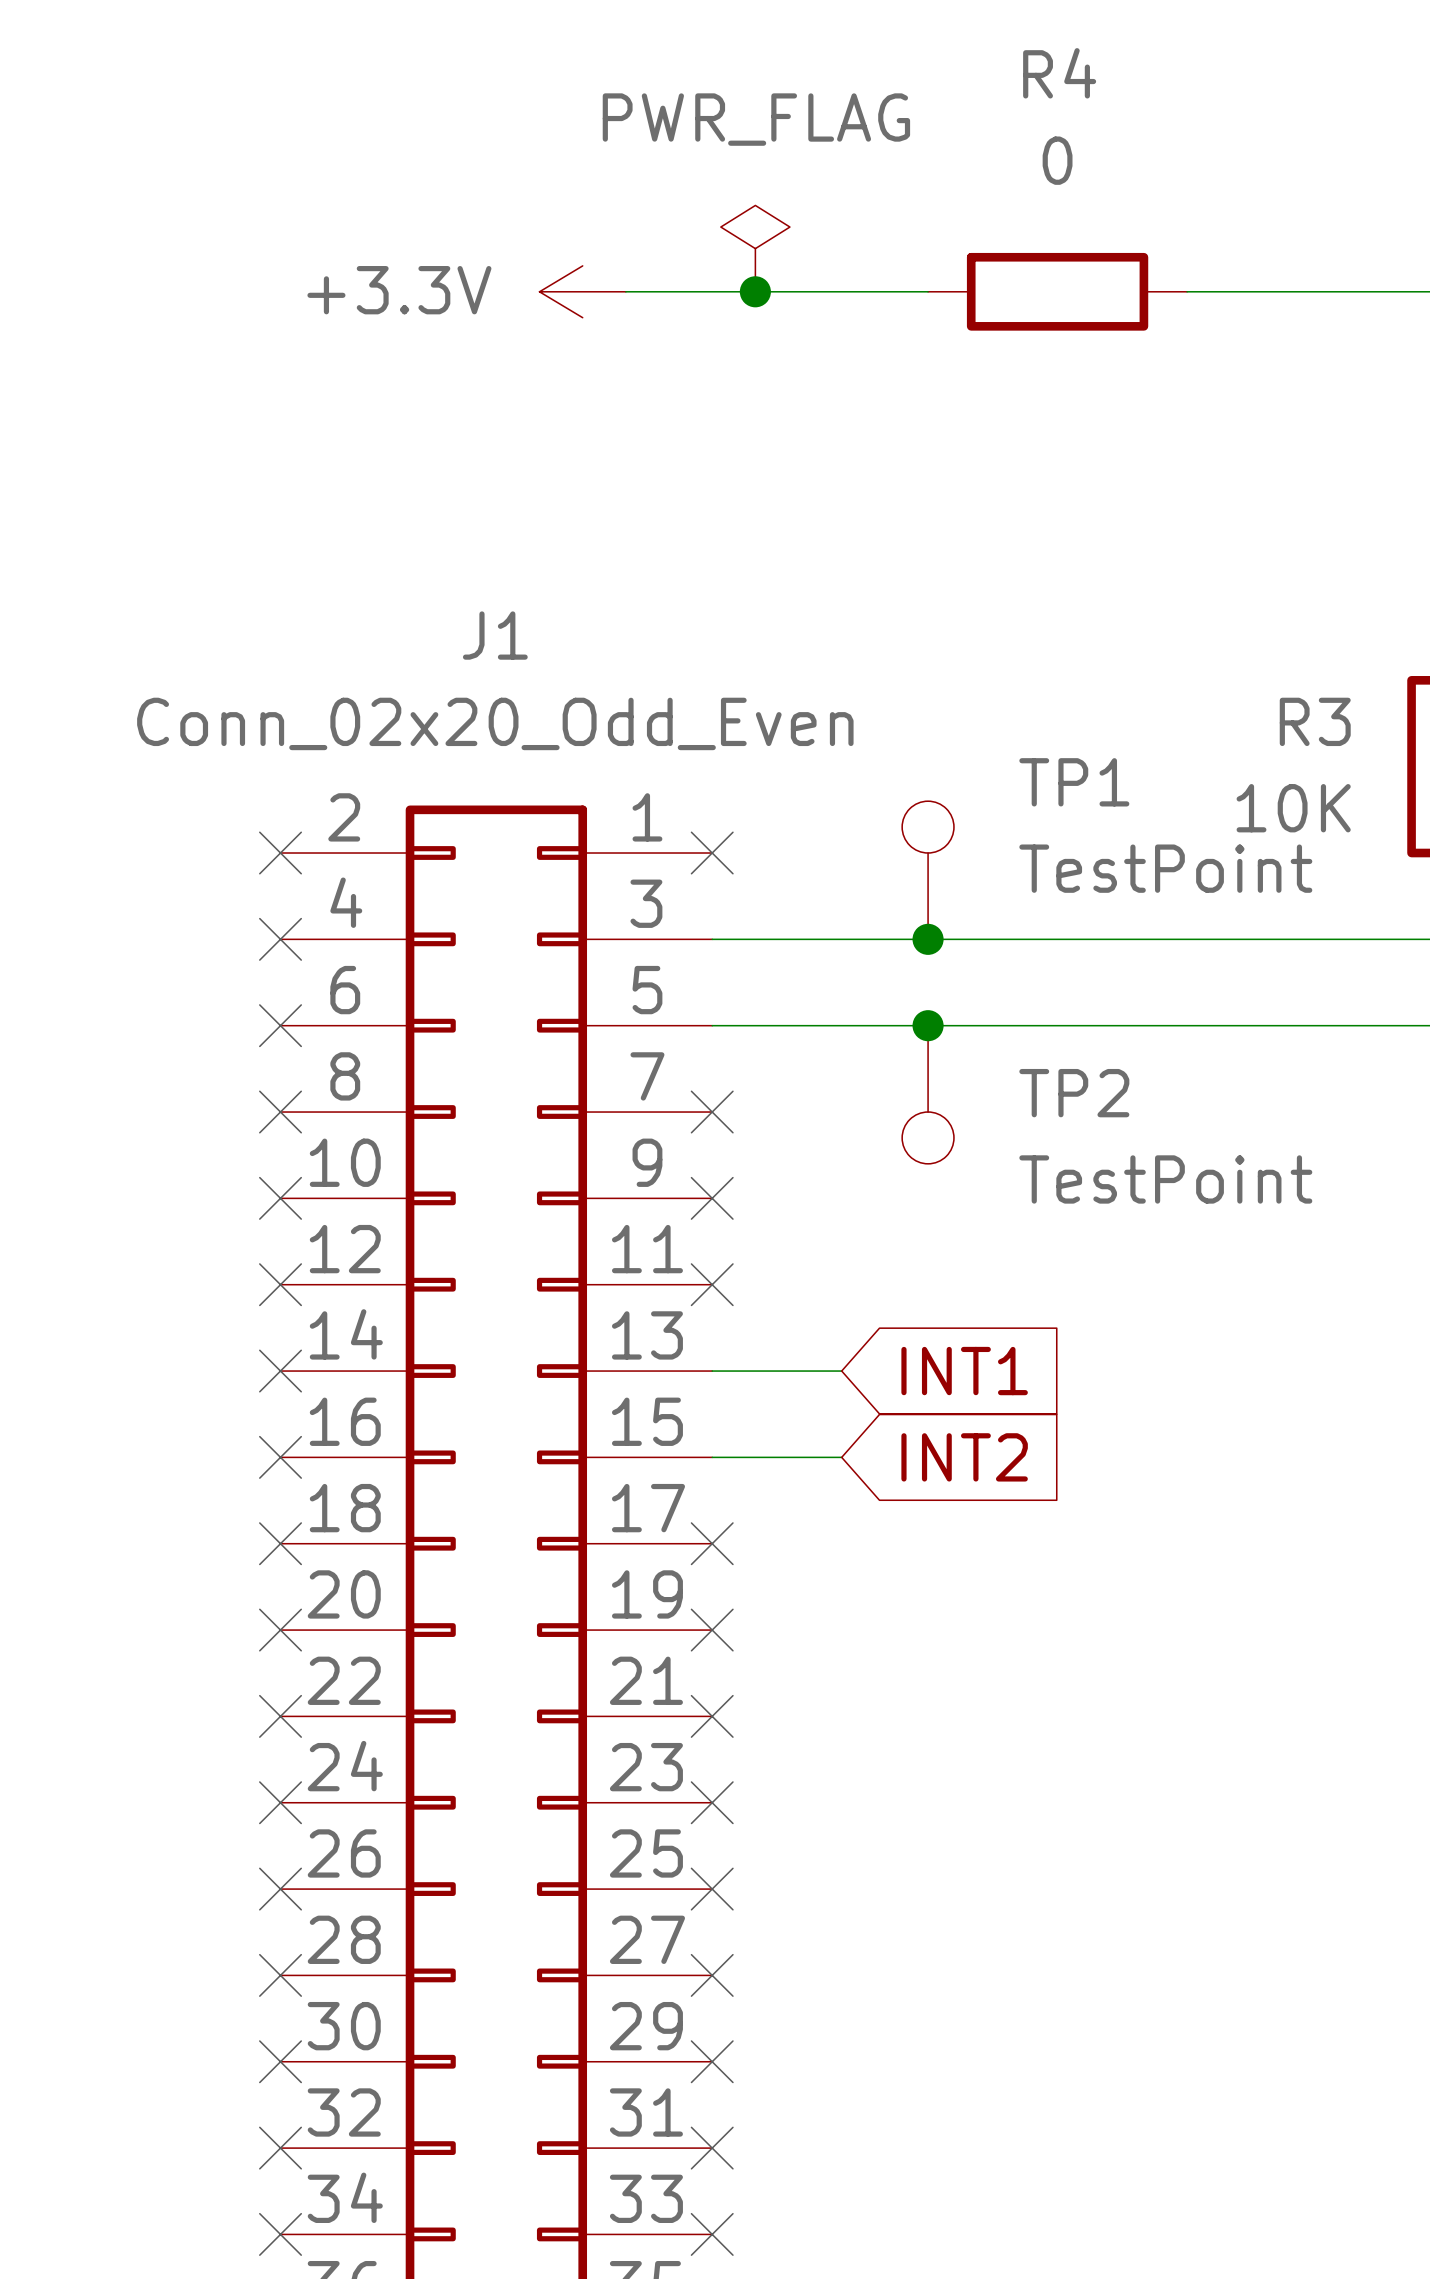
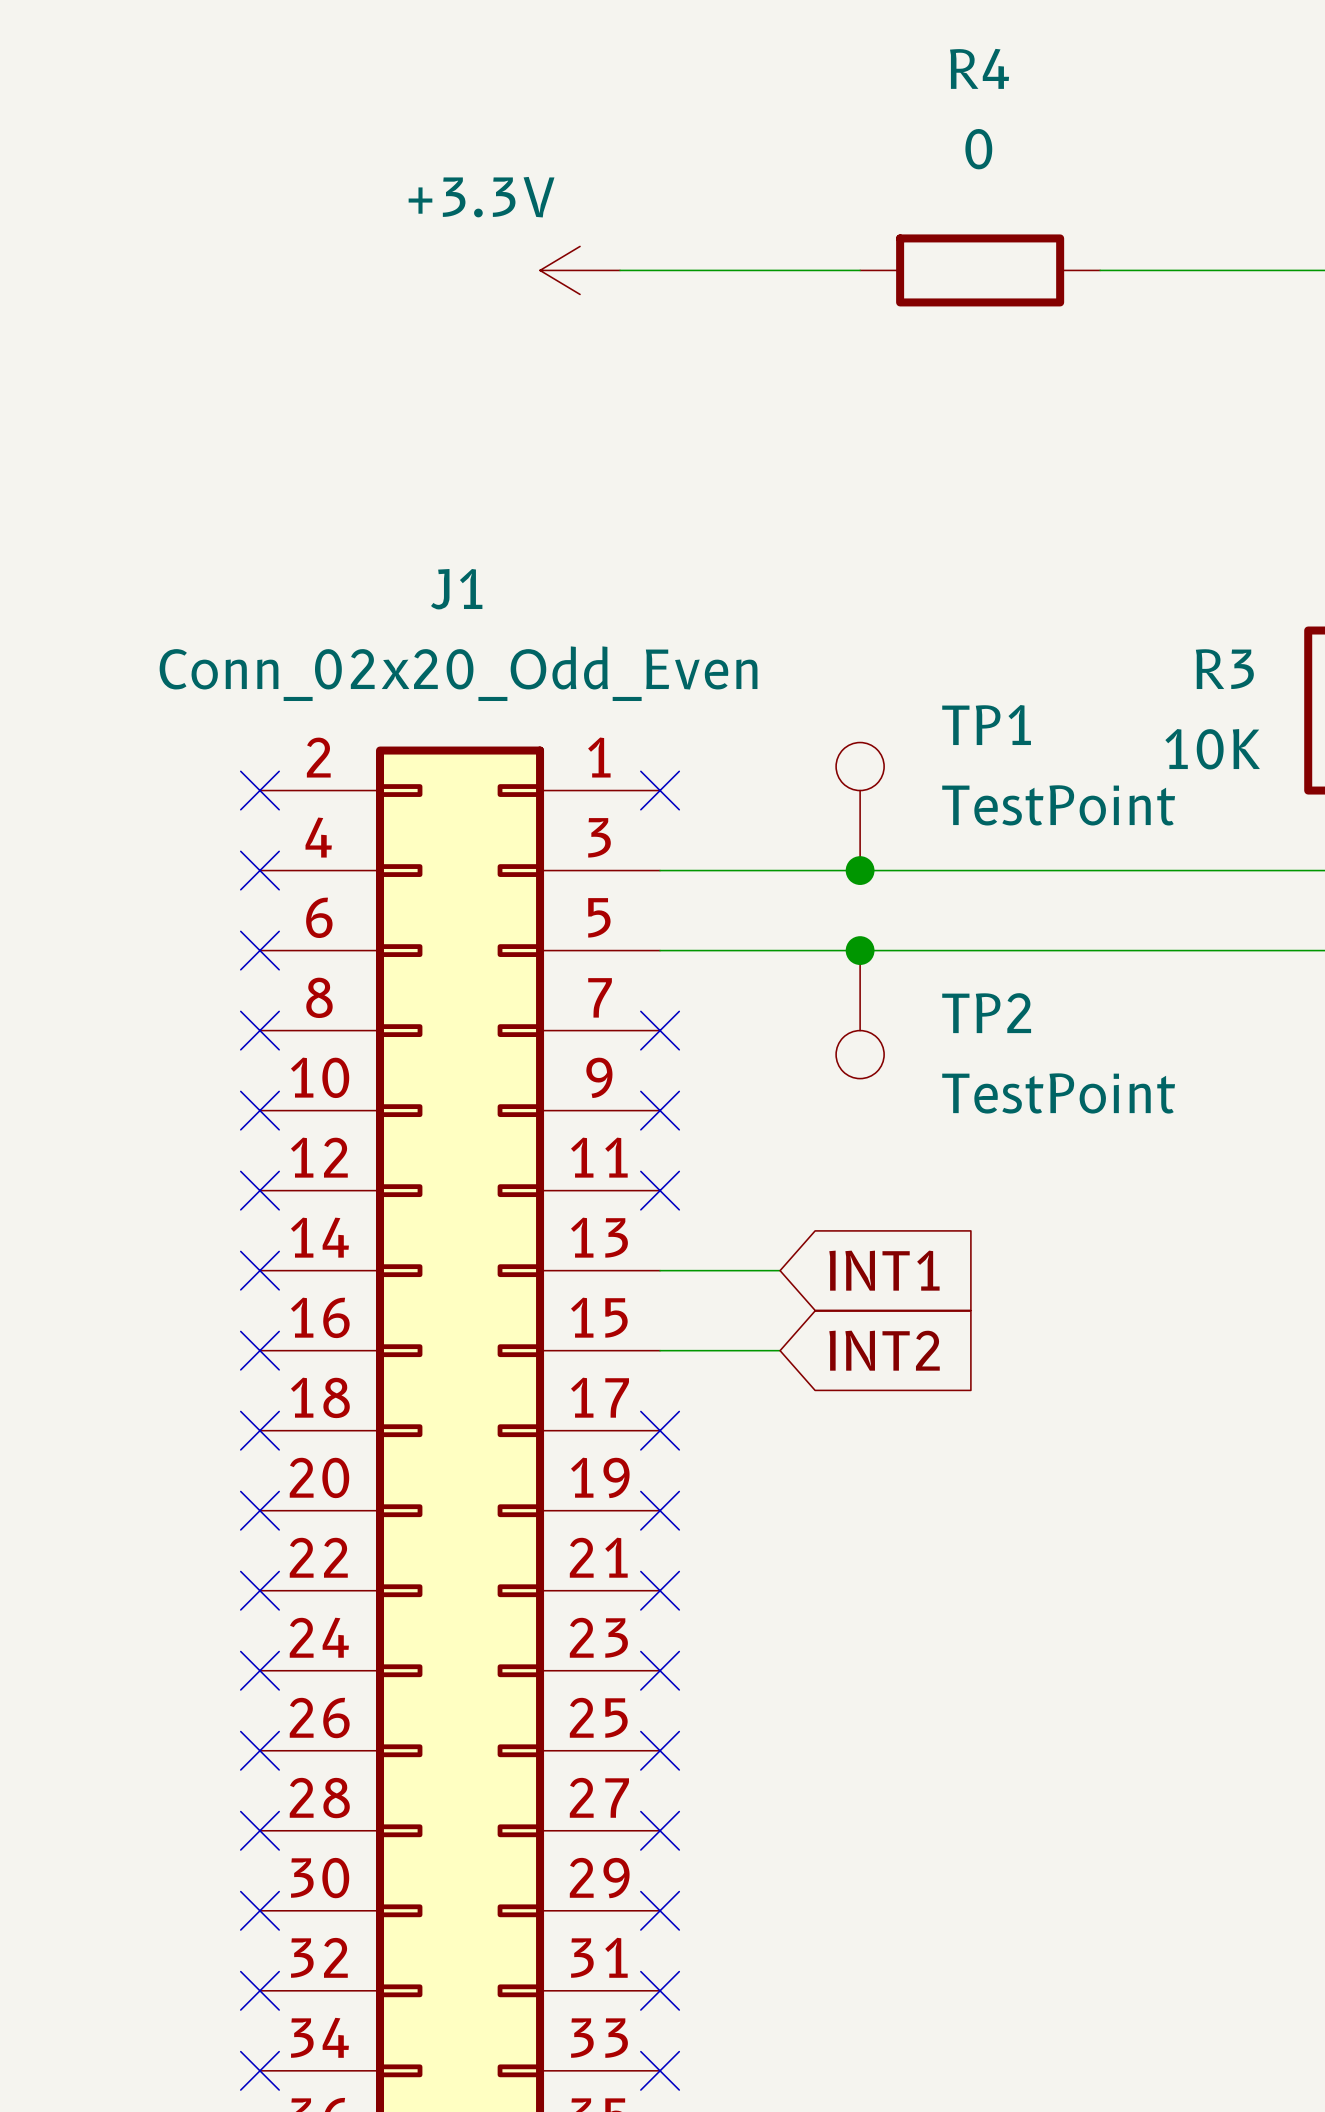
power symbol: PWR_FLAG (755, 248) -> none
power symbol text position: +3.3V (399, 290) -> +3.3V (481, 197)
power symbol position: +3.3V (582, 291) -> +3.3V (580, 270)
junction: (755, 291) -> none

